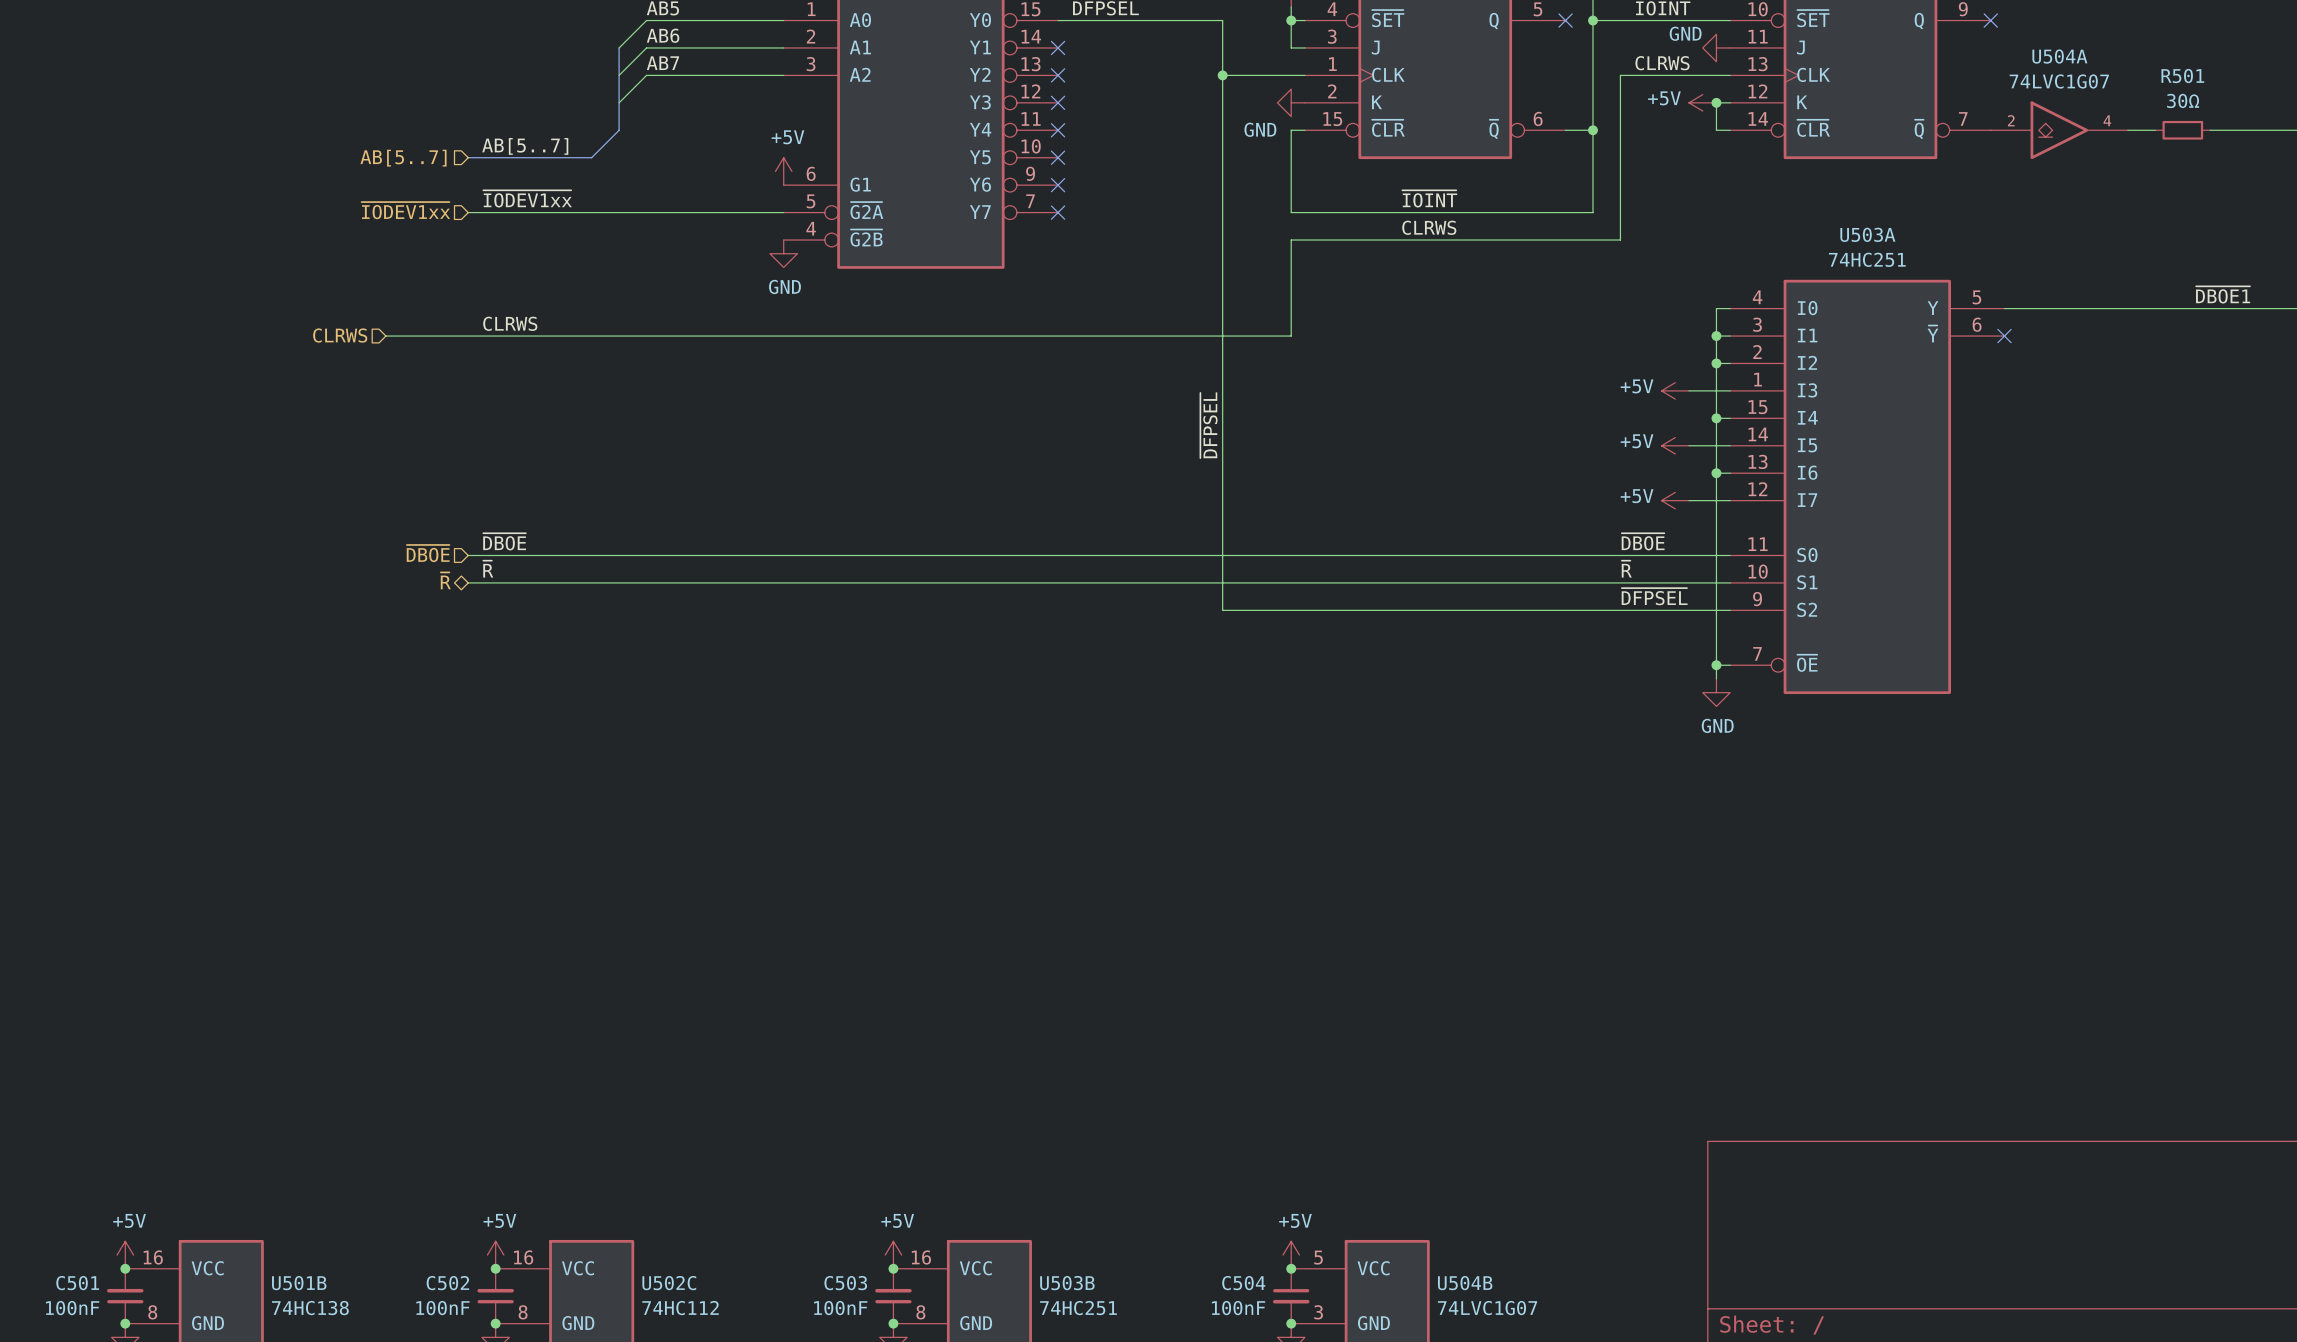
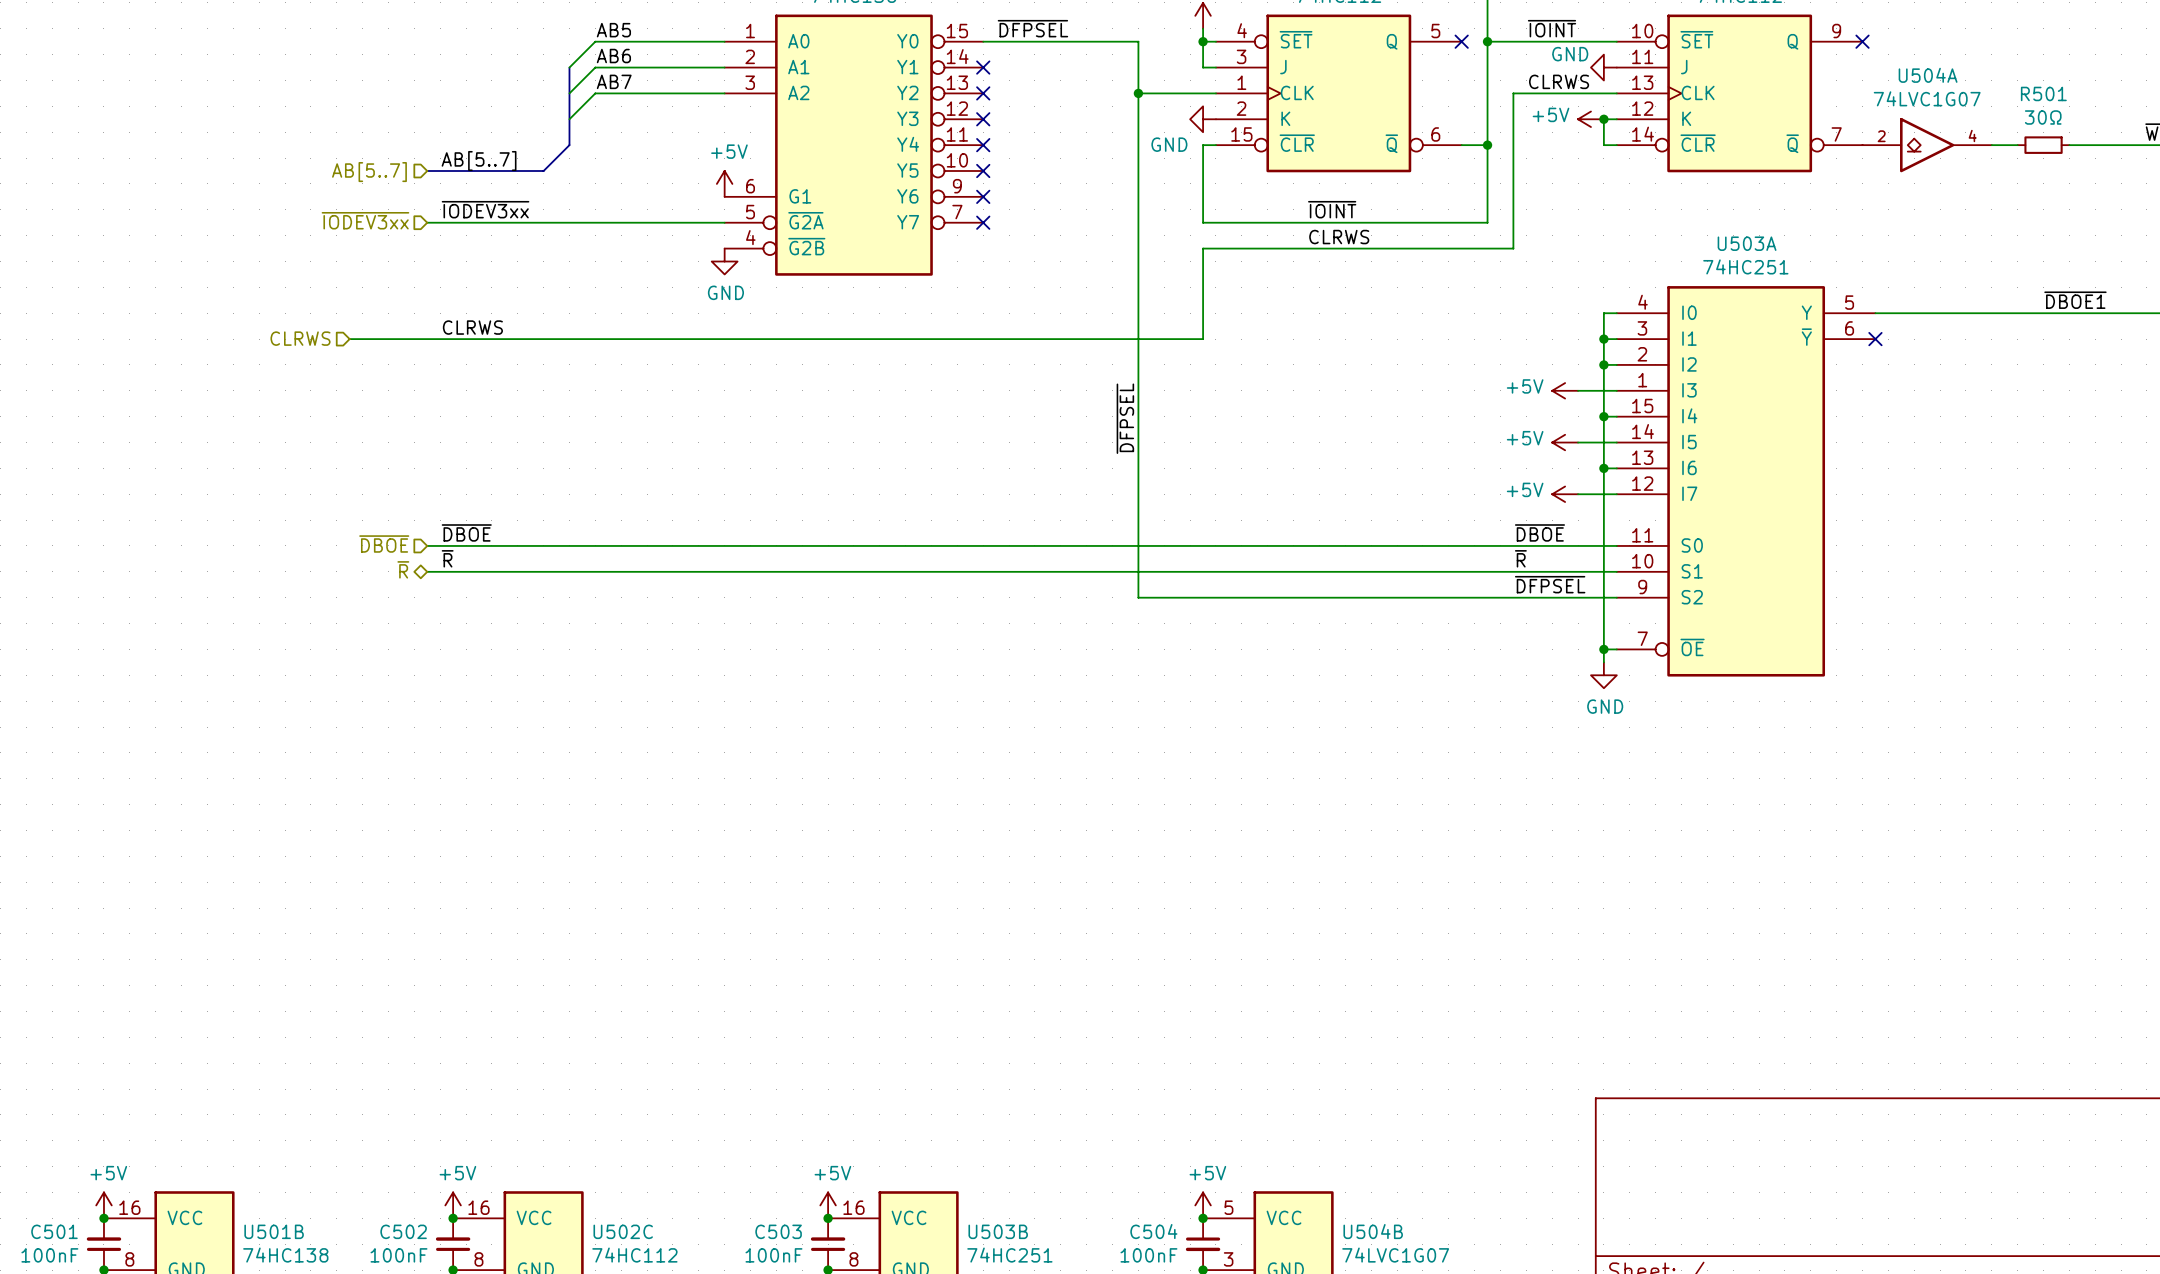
label: ~{IODEV1xx} (527, 198) -> ~{IODEV3xx} (485, 209)
hierarchical label: ~{IODEV1xx} (405, 210) -> ~{IODEV3xx} (365, 220)

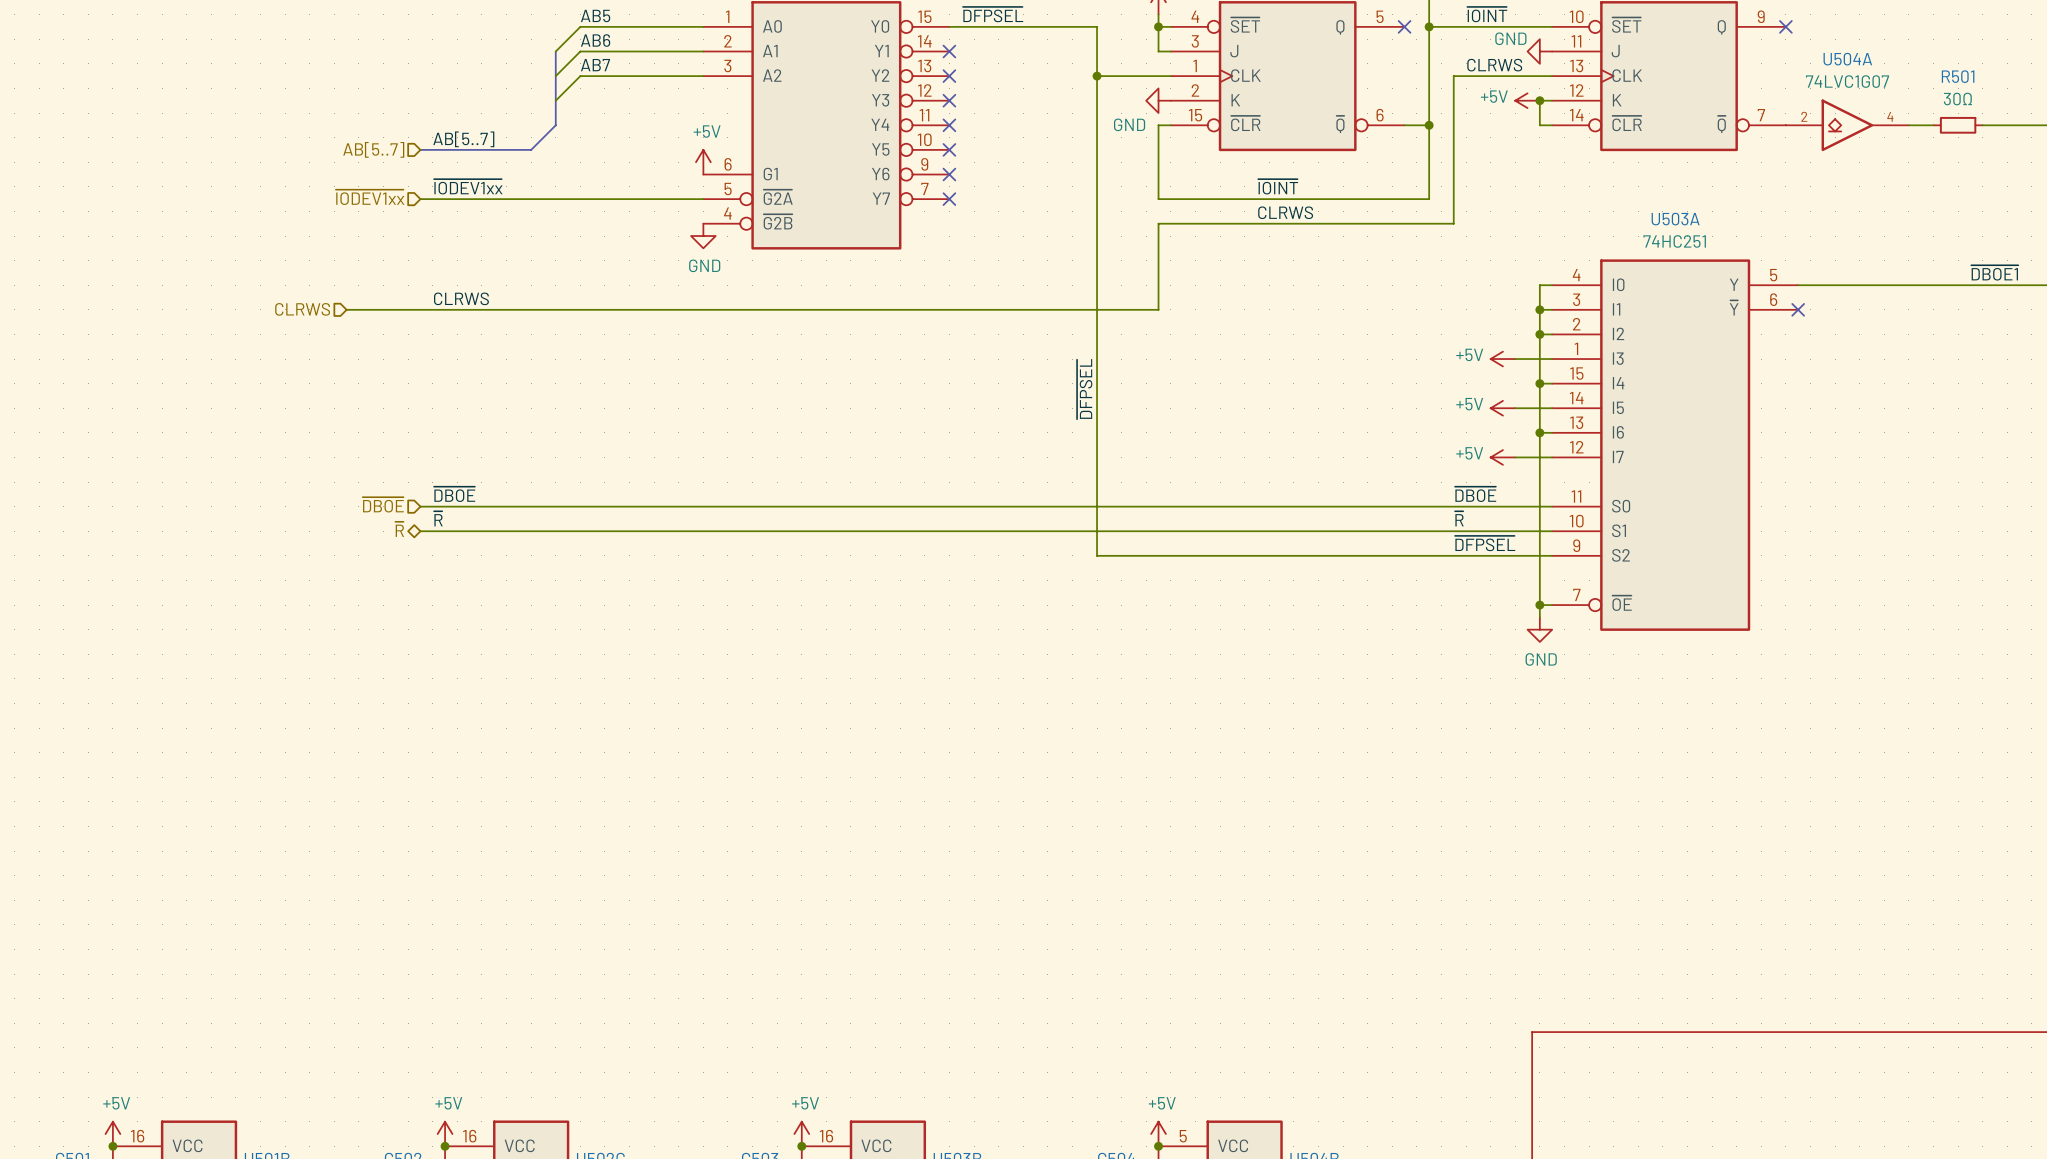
label: ~{IODEV3xx} (485, 209) -> ~{IODEV1xx} (468, 186)
hierarchical label: ~{IODEV3xx} (365, 220) -> ~{IODEV1xx} (370, 197)

